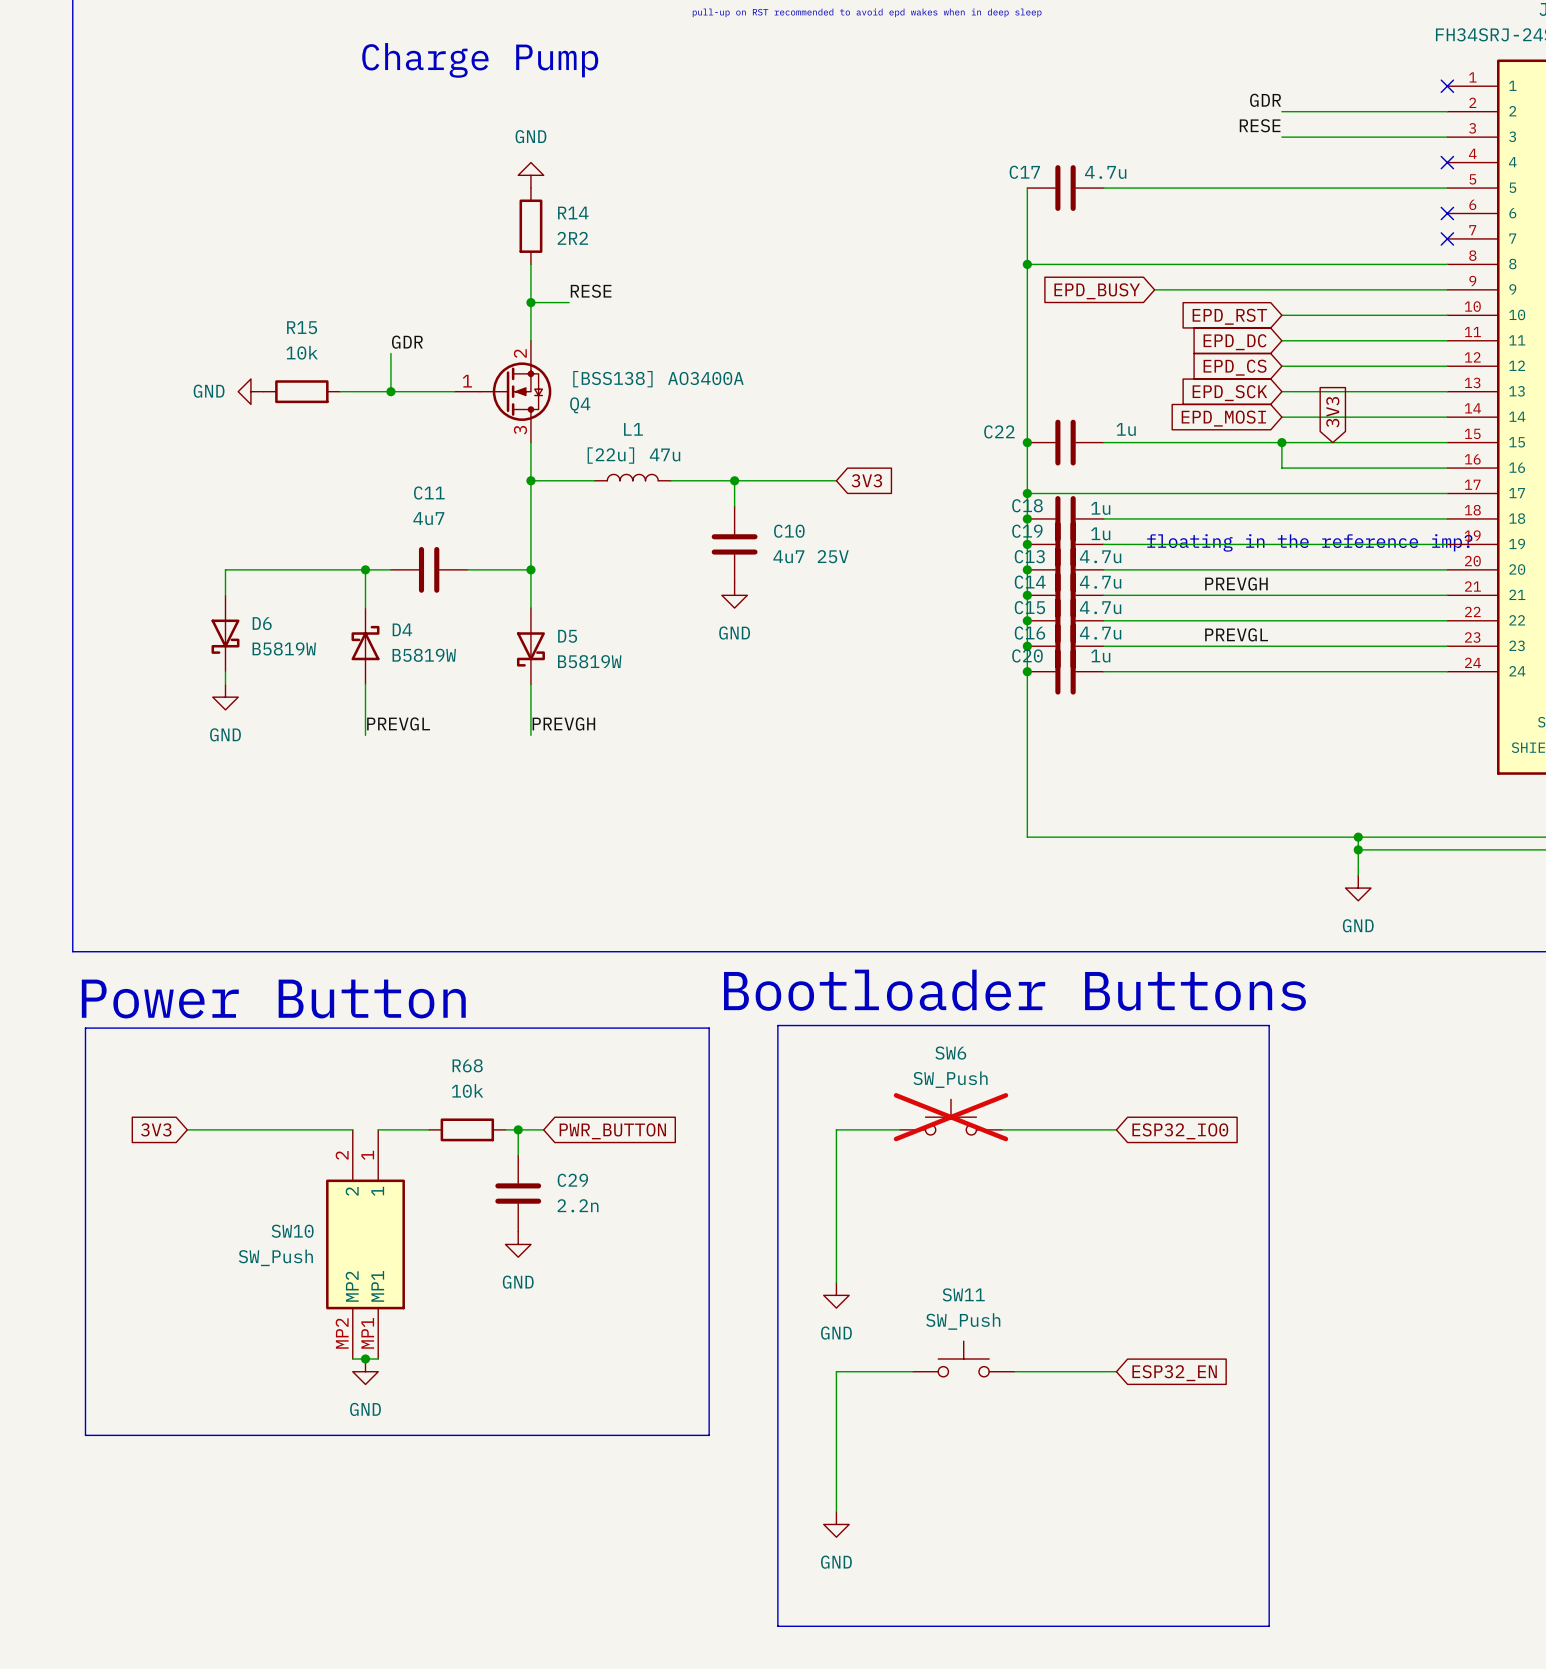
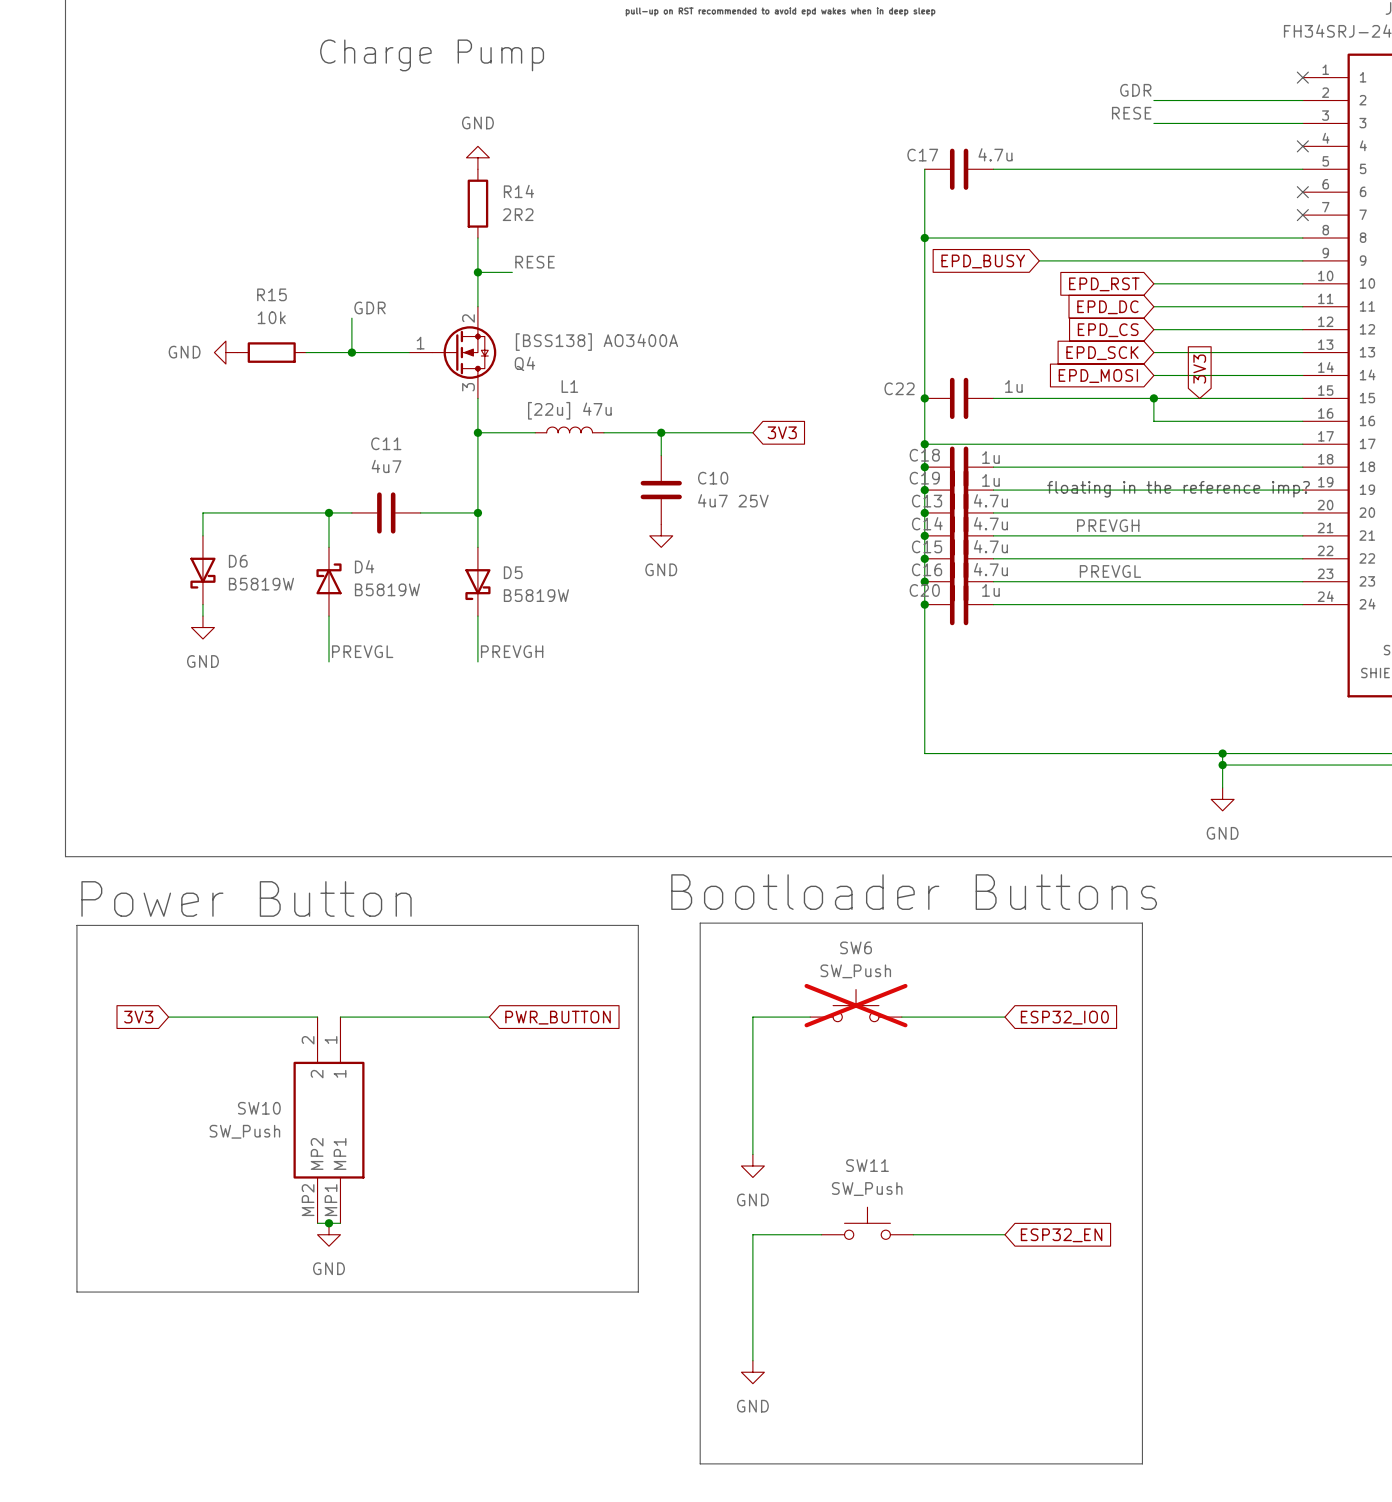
wire: none -> (386, 1017) (455, 1017)
R68: 10k (467, 1129) -> none
wire: (518, 1129) (518, 1155) -> none
junction: (518, 1129) -> none
C29: 2.2n (518, 1193) -> none
power symbol: GND (518, 1244) -> none

